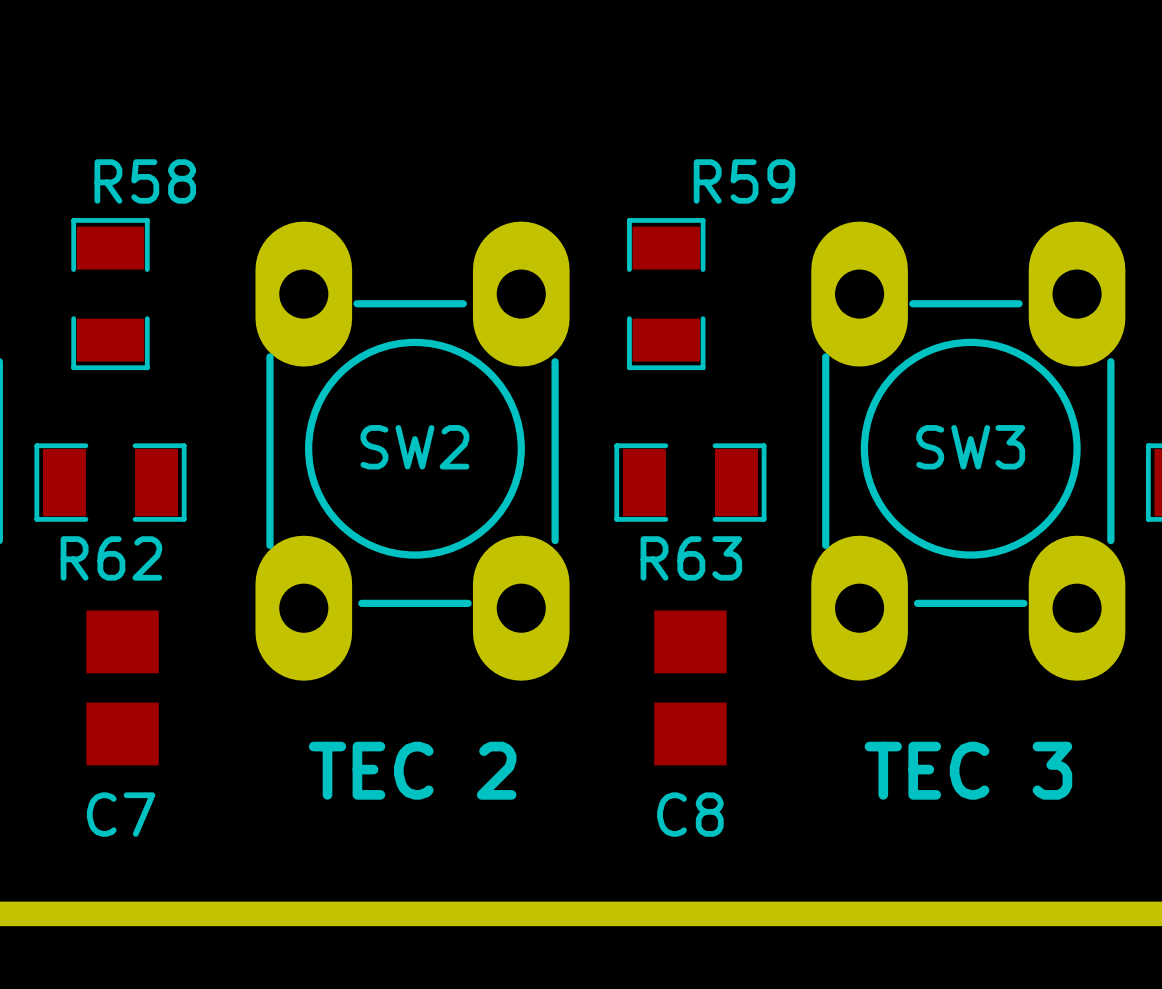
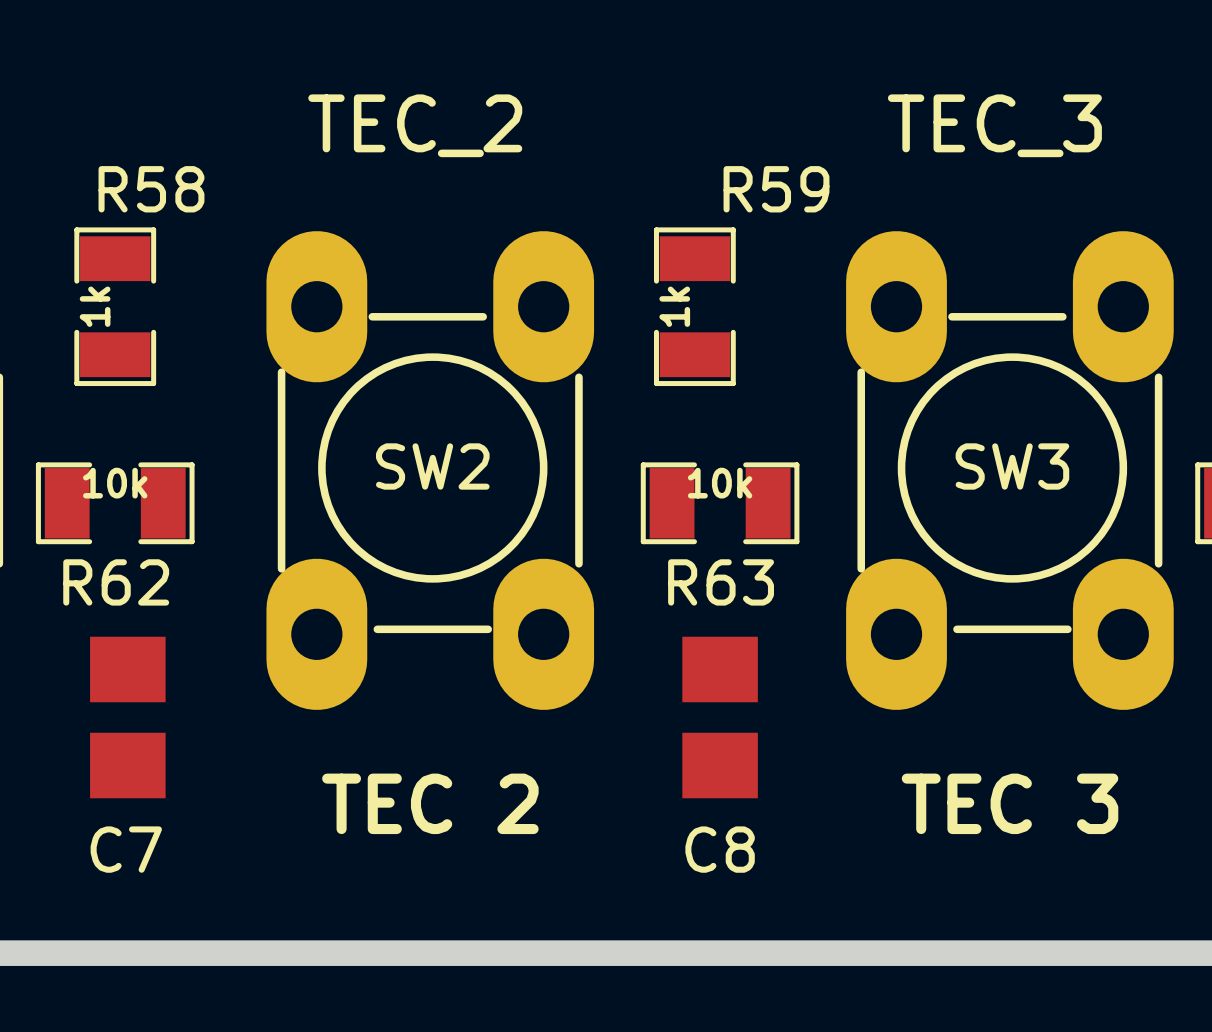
SW2 value: none -> TEC_2 (415, 125)
SW3 value: none -> TEC_3 (994, 125)
R58 value: none -> 1k (95, 306)
R59 value: none -> 1k (674, 306)
R62 value: none -> 10k (115, 483)
R63 value: none -> 10k (720, 483)

